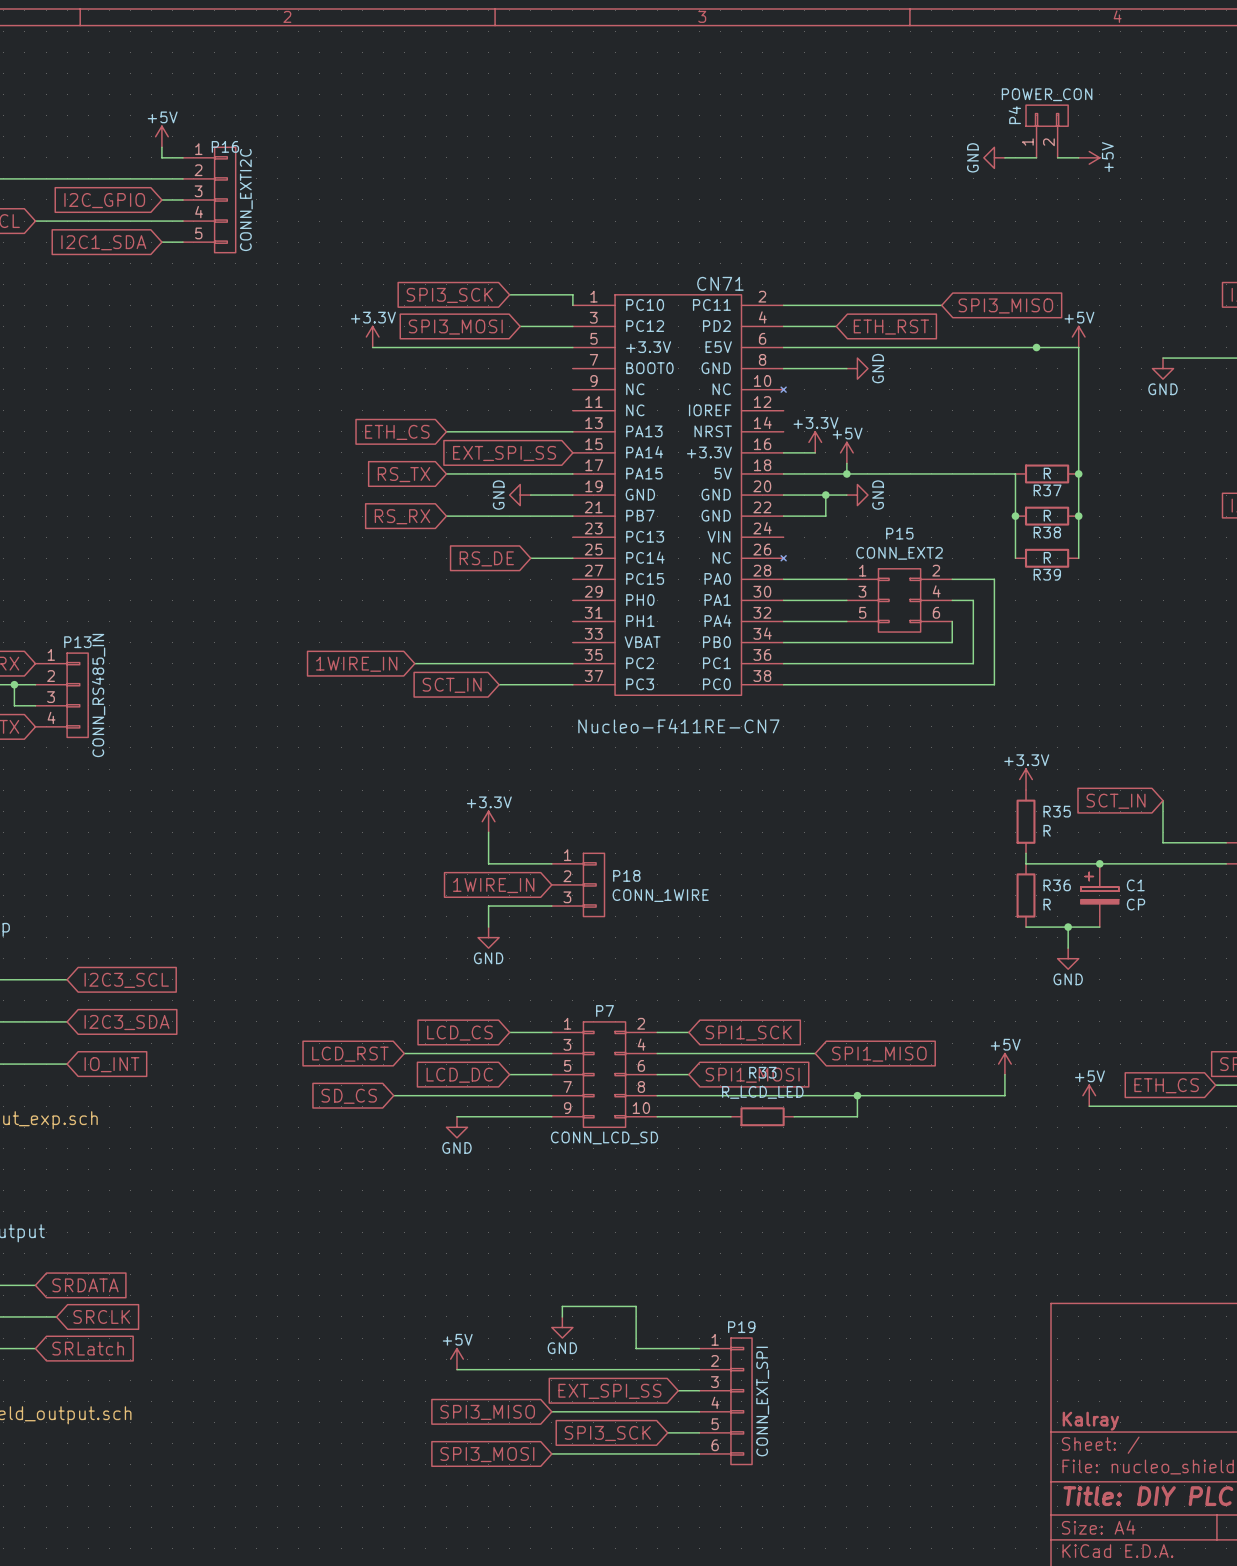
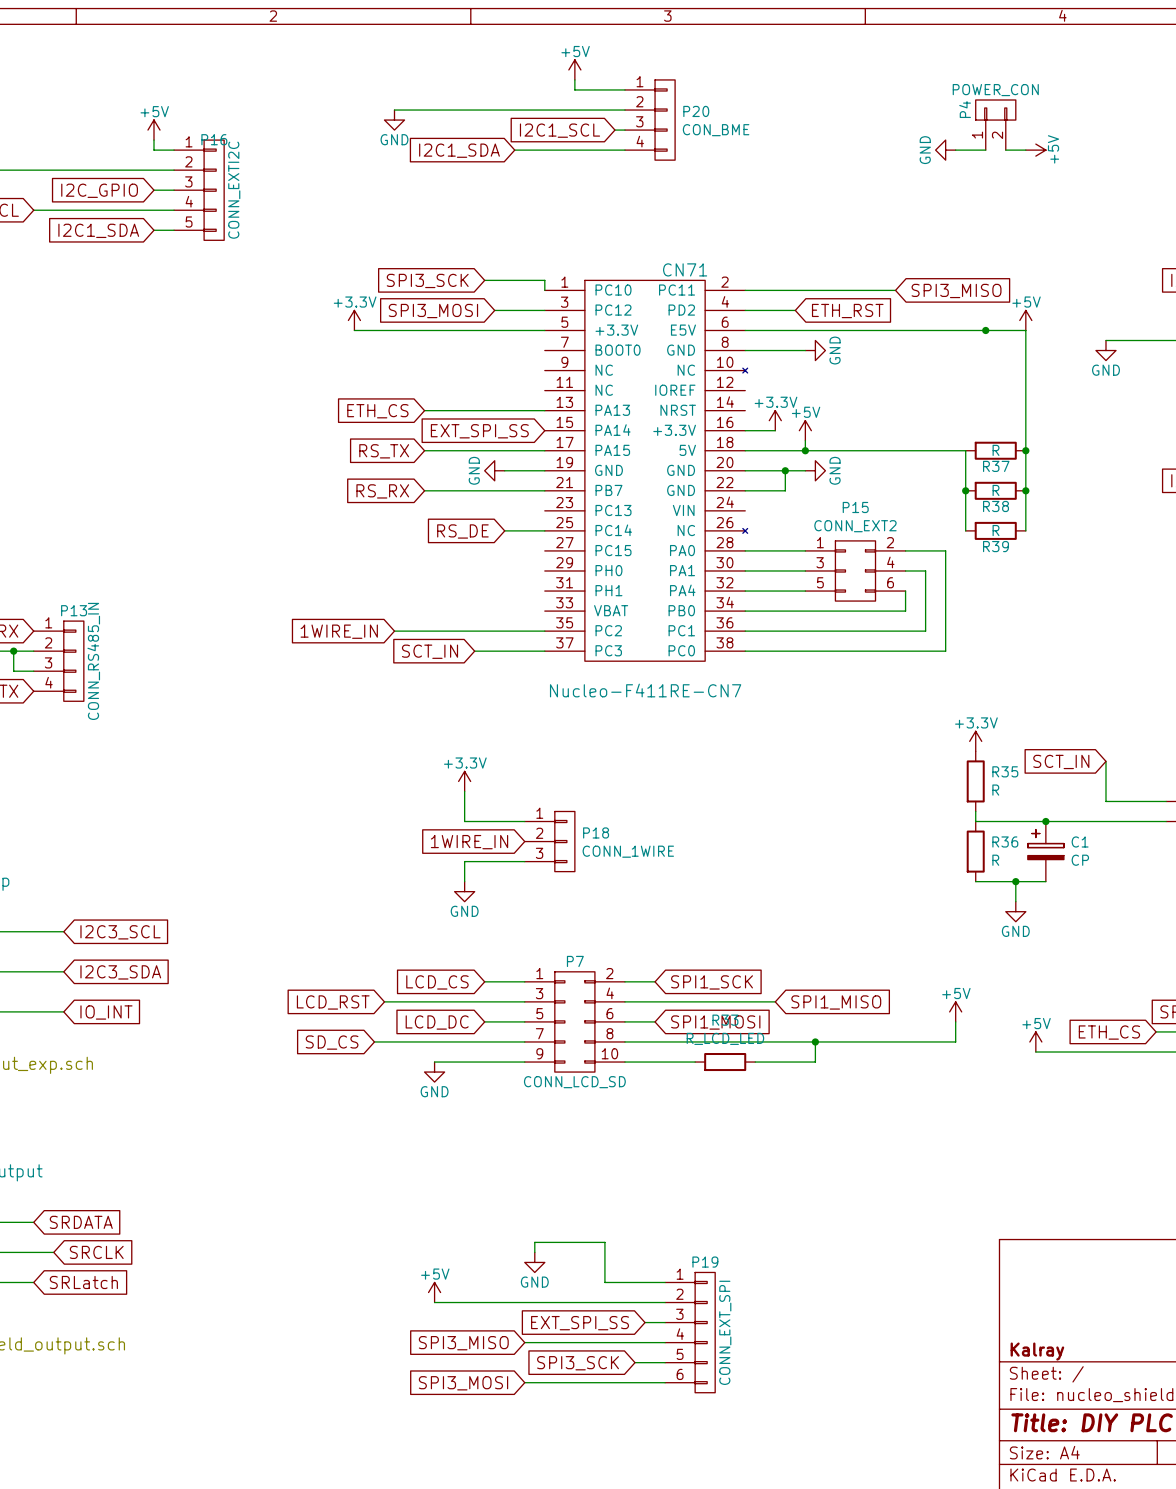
power symbol: none -> +5V (574, 69)
wire: none -> (574, 79) (574, 89) (624, 89)
wire: none -> (394, 110) (624, 110)
power symbol: none -> GND (394, 120)
P20: none -> CON_BME (650, 120)
wire: none -> (614, 130) (624, 130)
global label: none -> I2C1_SCL (559, 130)
wire: none -> (514, 150) (624, 150)
global label: none -> I2C1_SDA (459, 150)

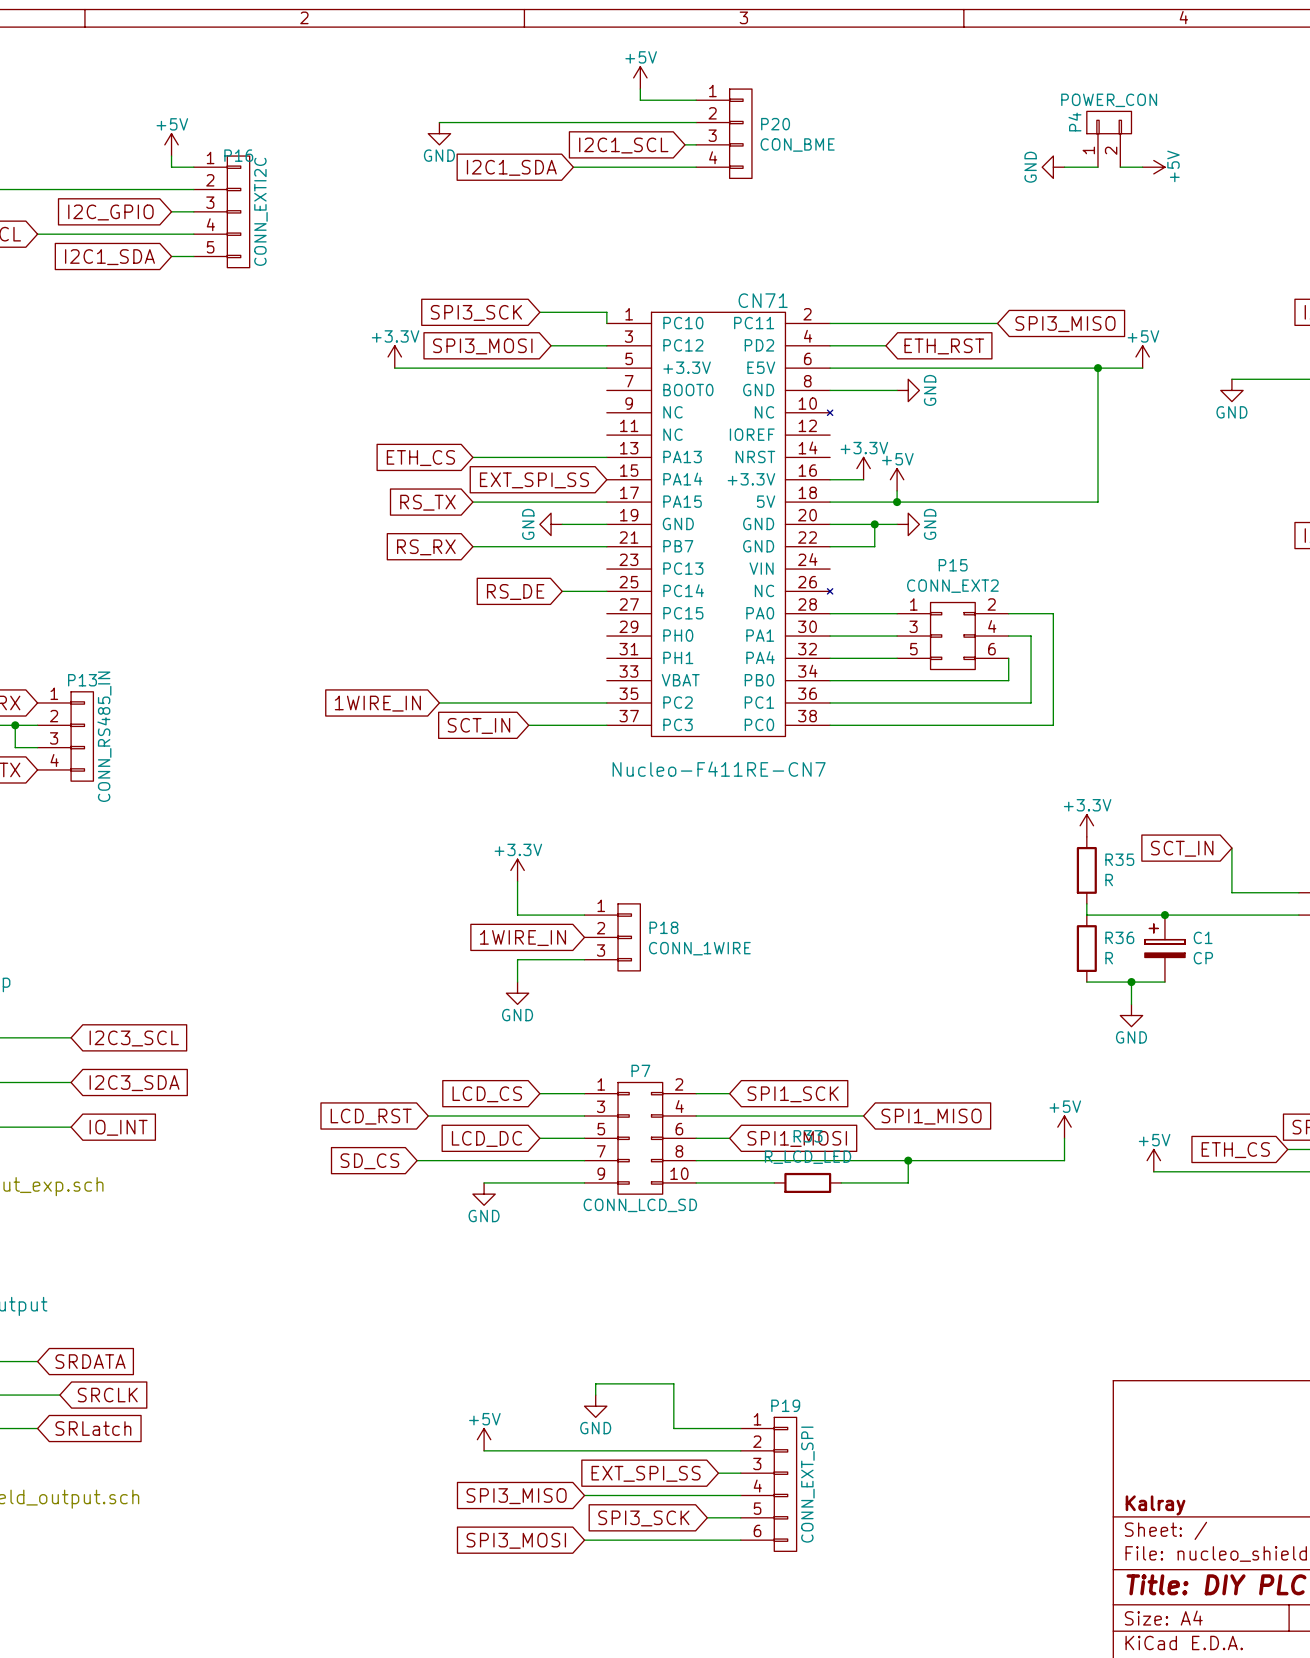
wire: (1025, 330) (1025, 530) -> none
wire: (965, 450) (965, 530) -> (1075, 502) (1097, 502) (1097, 368)
R37: R (995, 450) -> none
junction: (1025, 450) -> none
junction: (965, 490) -> none
R38: R (995, 490) -> none
junction: (1025, 490) -> none
R39: R (995, 530) -> none

